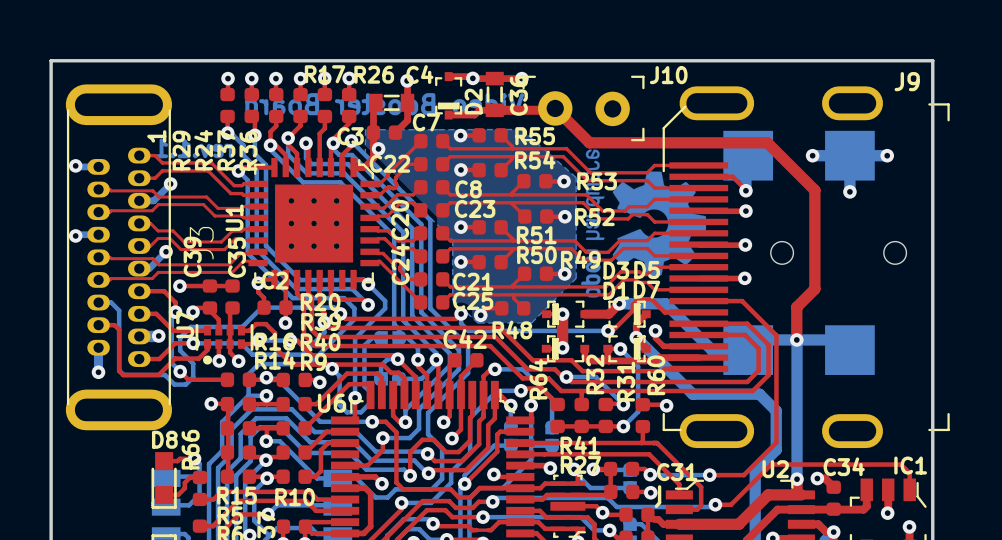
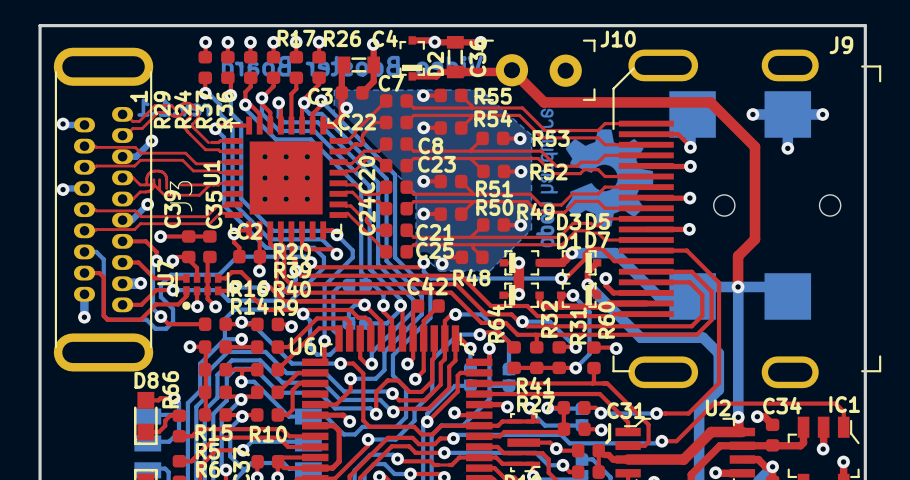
top track: (142, 155) (155, 155) (162, 162) (211, 162) (234, 185) -> (125, 114) (132, 121) (139, 121) (155, 105) (171, 105) (176, 109) (183, 103) (189, 103) (198, 113) (192, 126) (208, 142)
top track: (142, 178) (155, 178) (162, 170) (208, 170) (230, 193) (241, 193) -> (125, 135) (132, 128) (142, 128) (158, 112) (168, 112) (176, 116) (186, 110) (191, 114) (185, 124) (187, 131) (205, 149) (218, 149)
top track: none -> (159, 179) (159, 188)
top track: none -> (146, 183) (149, 172) (160, 171) (165, 175) (166, 188)
top track: (163, 238) (169, 238) (180, 249) (224, 249) (235, 238) -> (145, 192) (152, 188) (153, 179)

